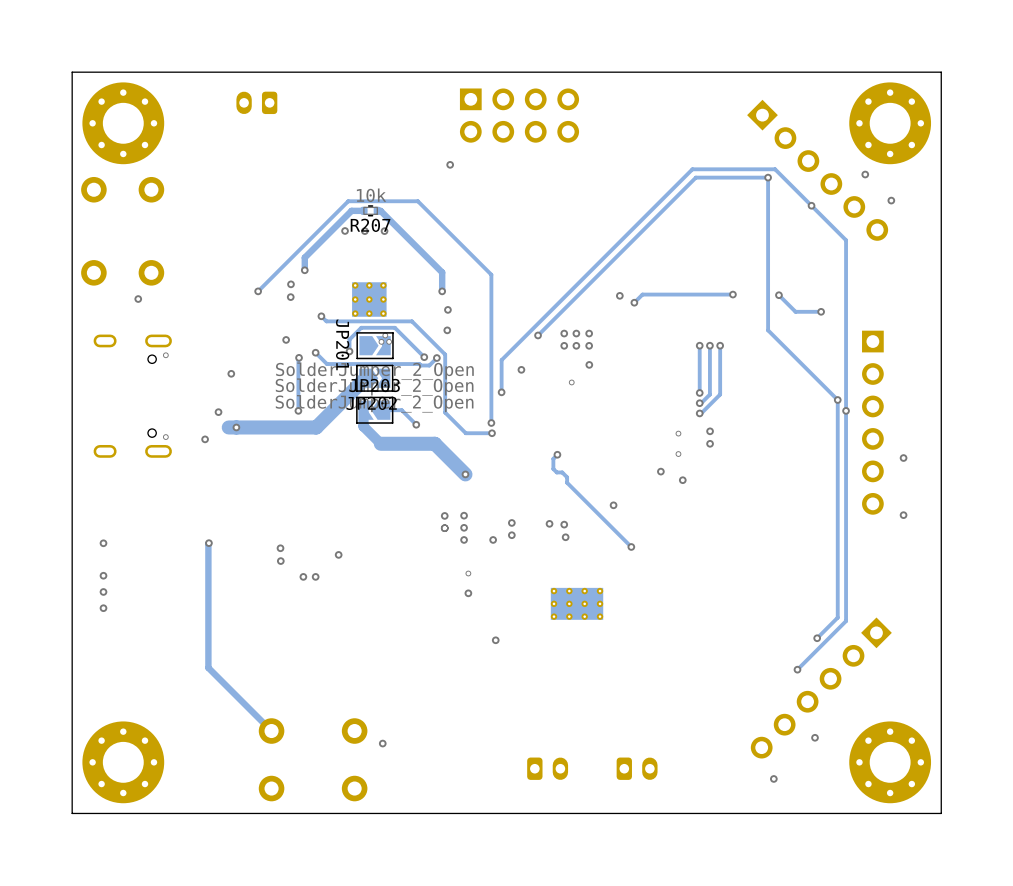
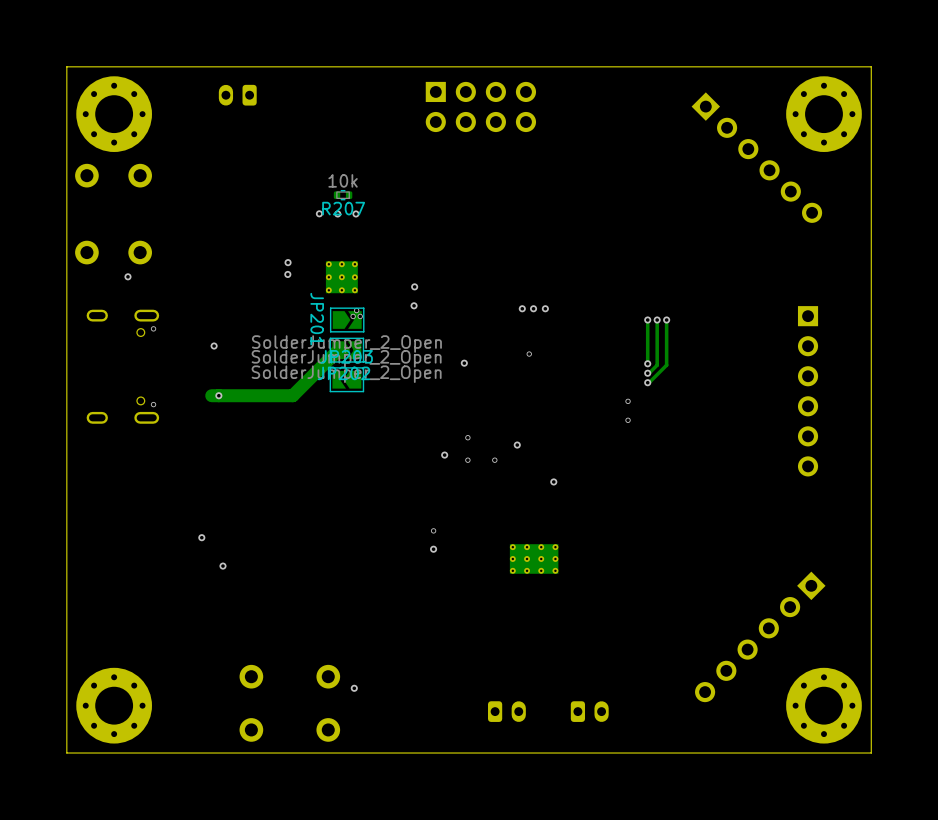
via: (450, 164) -> none
via: (865, 174) -> none
via: (768, 177) -> none
via: (891, 200) -> none
via: (811, 205) -> none
track: (364, 210) (351, 210) (304, 257) (304, 270) -> none
track: (377, 210) (380, 210) (442, 272) (442, 291) -> none
via: (304, 270) -> none
via: none -> (288, 262)
via: (290, 284) -> none
via: (258, 291) -> none
via: (442, 291) -> none
track: (258, 292) (348, 201) (417, 201) (491, 274) (491, 423) -> none
track: (732, 294) (642, 294) (634, 302) -> none
via: (732, 294) -> none
via: (619, 295) -> none
track: (778, 295) (795, 311) (821, 311) -> none
via: (778, 295) -> none
via: none -> (287, 274)
via: (290, 297) -> none
via: (634, 302) -> none
via: (821, 311) -> none
track: (321, 316) (326, 321) (411, 321) (445, 354) (445, 412) (465, 433) (492, 433) -> none
via: (321, 316) -> none
track: (538, 335) (695, 177) (768, 177) (768, 330) (837, 400) (837, 617) (817, 638) -> none
via: (538, 335) -> none
via: (286, 339) -> none
via: (564, 345) -> none
via: (576, 345) -> none
via: (589, 345) -> none
track: (349, 351) (349, 339) (361, 327) (394, 327) (424, 357) -> none
via: (349, 351) -> none
track: (315, 352) (326, 364) (429, 365) (436, 358) -> none
via: (315, 352) -> none
track: (299, 357) (298, 410) -> none
via: (299, 357) -> none
via: (424, 357) -> none
via: (436, 358) -> none
via: (589, 364) -> none
via: (521, 369) -> none
track: (501, 392) (501, 360) (692, 169) (775, 169) (846, 240) (846, 621) (797, 669) -> none
via: (837, 400) -> none
via: (298, 410) -> none
track: (363, 410) (363, 426) (380, 443) (434, 443) (465, 474) -> none
track: (384, 410) (401, 410) (416, 424) -> none
via: (846, 410) -> none
via: (218, 412) -> none
via: (491, 423) -> none
via: (416, 424) -> none
via: (710, 431) -> none
via: (492, 433) -> none
via: (205, 439) -> none
via: (710, 443) -> none
track: (557, 454) (553, 458) (553, 469) (556, 472) (562, 472) (567, 477) (567, 482) (631, 546) -> none
via: (557, 454) -> none
via: (903, 458) -> none
via: (660, 471) -> none
via: none -> (467, 437)
via: (465, 474) -> none
via: none -> (517, 445)
via: (682, 480) -> none
via: none -> (444, 455)
via: none -> (467, 460)
via: none -> (494, 460)
via: (613, 505) -> none
via: (444, 515) -> none
via: (464, 515) -> none
via: (903, 515) -> none
via: none -> (553, 481)
via: (511, 522) -> none
via: (549, 523) -> none
via: (564, 524) -> none
via: (464, 527) -> none
via: (444, 528) -> none
via: (511, 535) -> none
via: (565, 537) -> none
via: (464, 539) -> none
via: (493, 539) -> none
via: (103, 543) -> none
track: (208, 543) (208, 667) (271, 731) -> none
via: (208, 543) -> none
via: (631, 546) -> none
via: (280, 548) -> none
via: (338, 554) -> none
via: (280, 561) -> none
via: (103, 575) -> none
via: (303, 576) -> none
via: (315, 576) -> none
via: none -> (201, 537)
via: (103, 591) -> none
via: (103, 608) -> none
via: none -> (222, 566)
via: (817, 638) -> none
via: (495, 640) -> none
via: (797, 669) -> none
via: (815, 737) -> none
via: (773, 778) -> none

